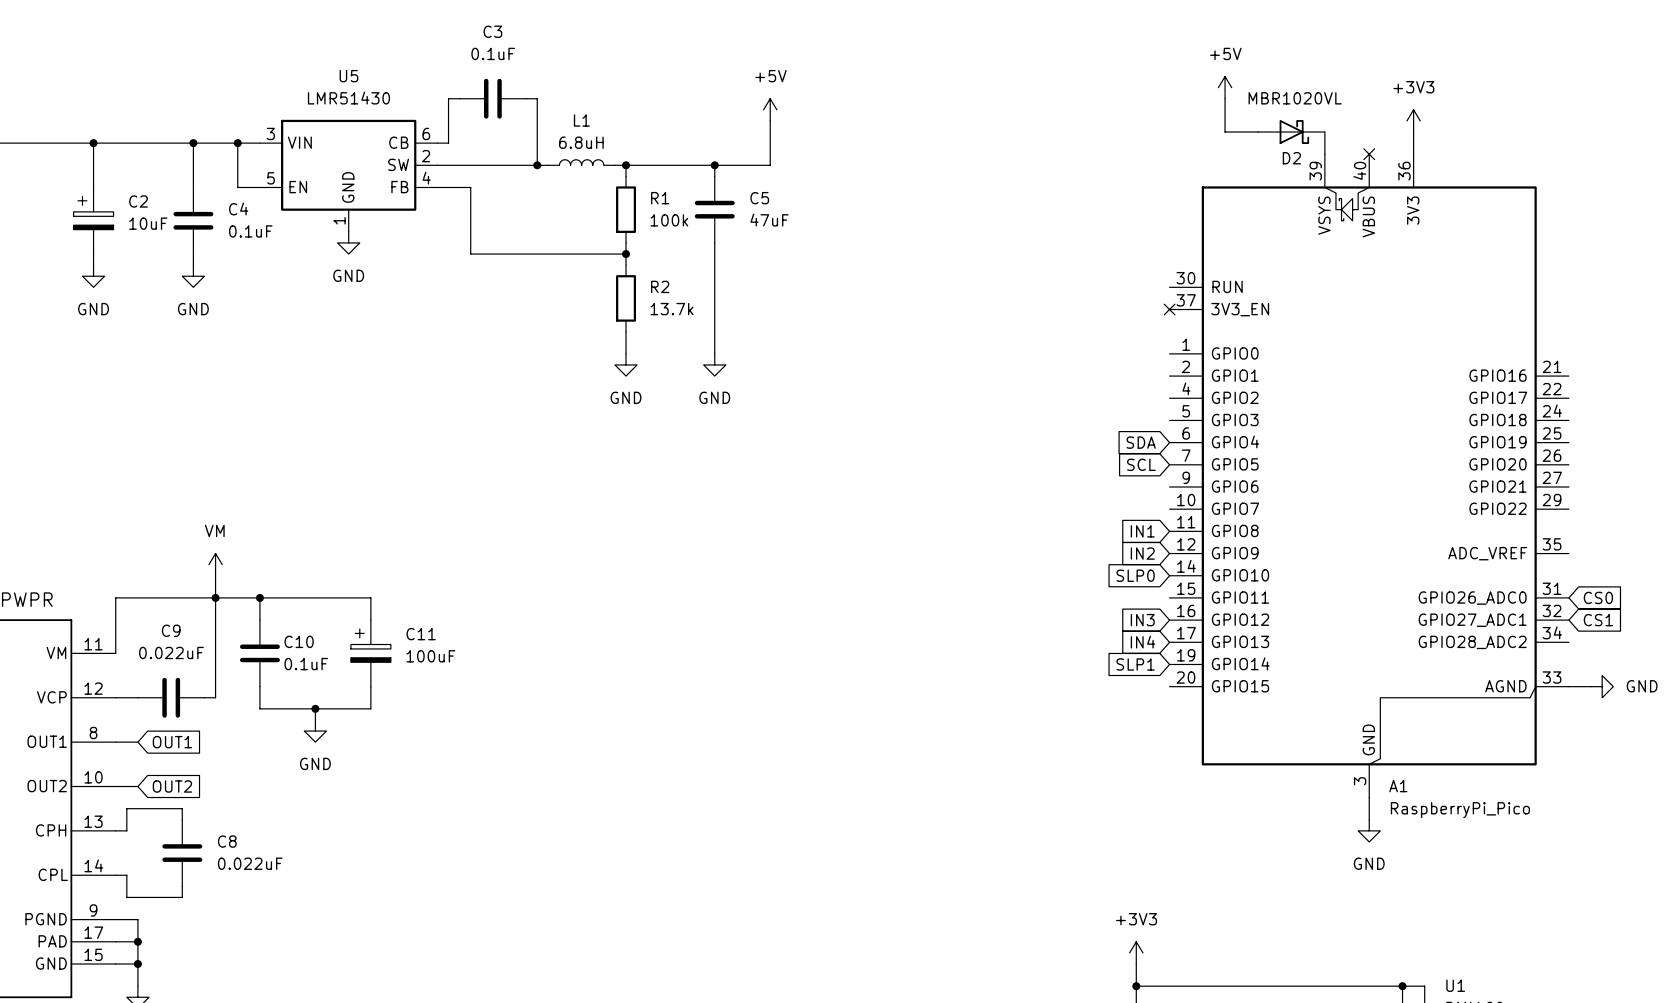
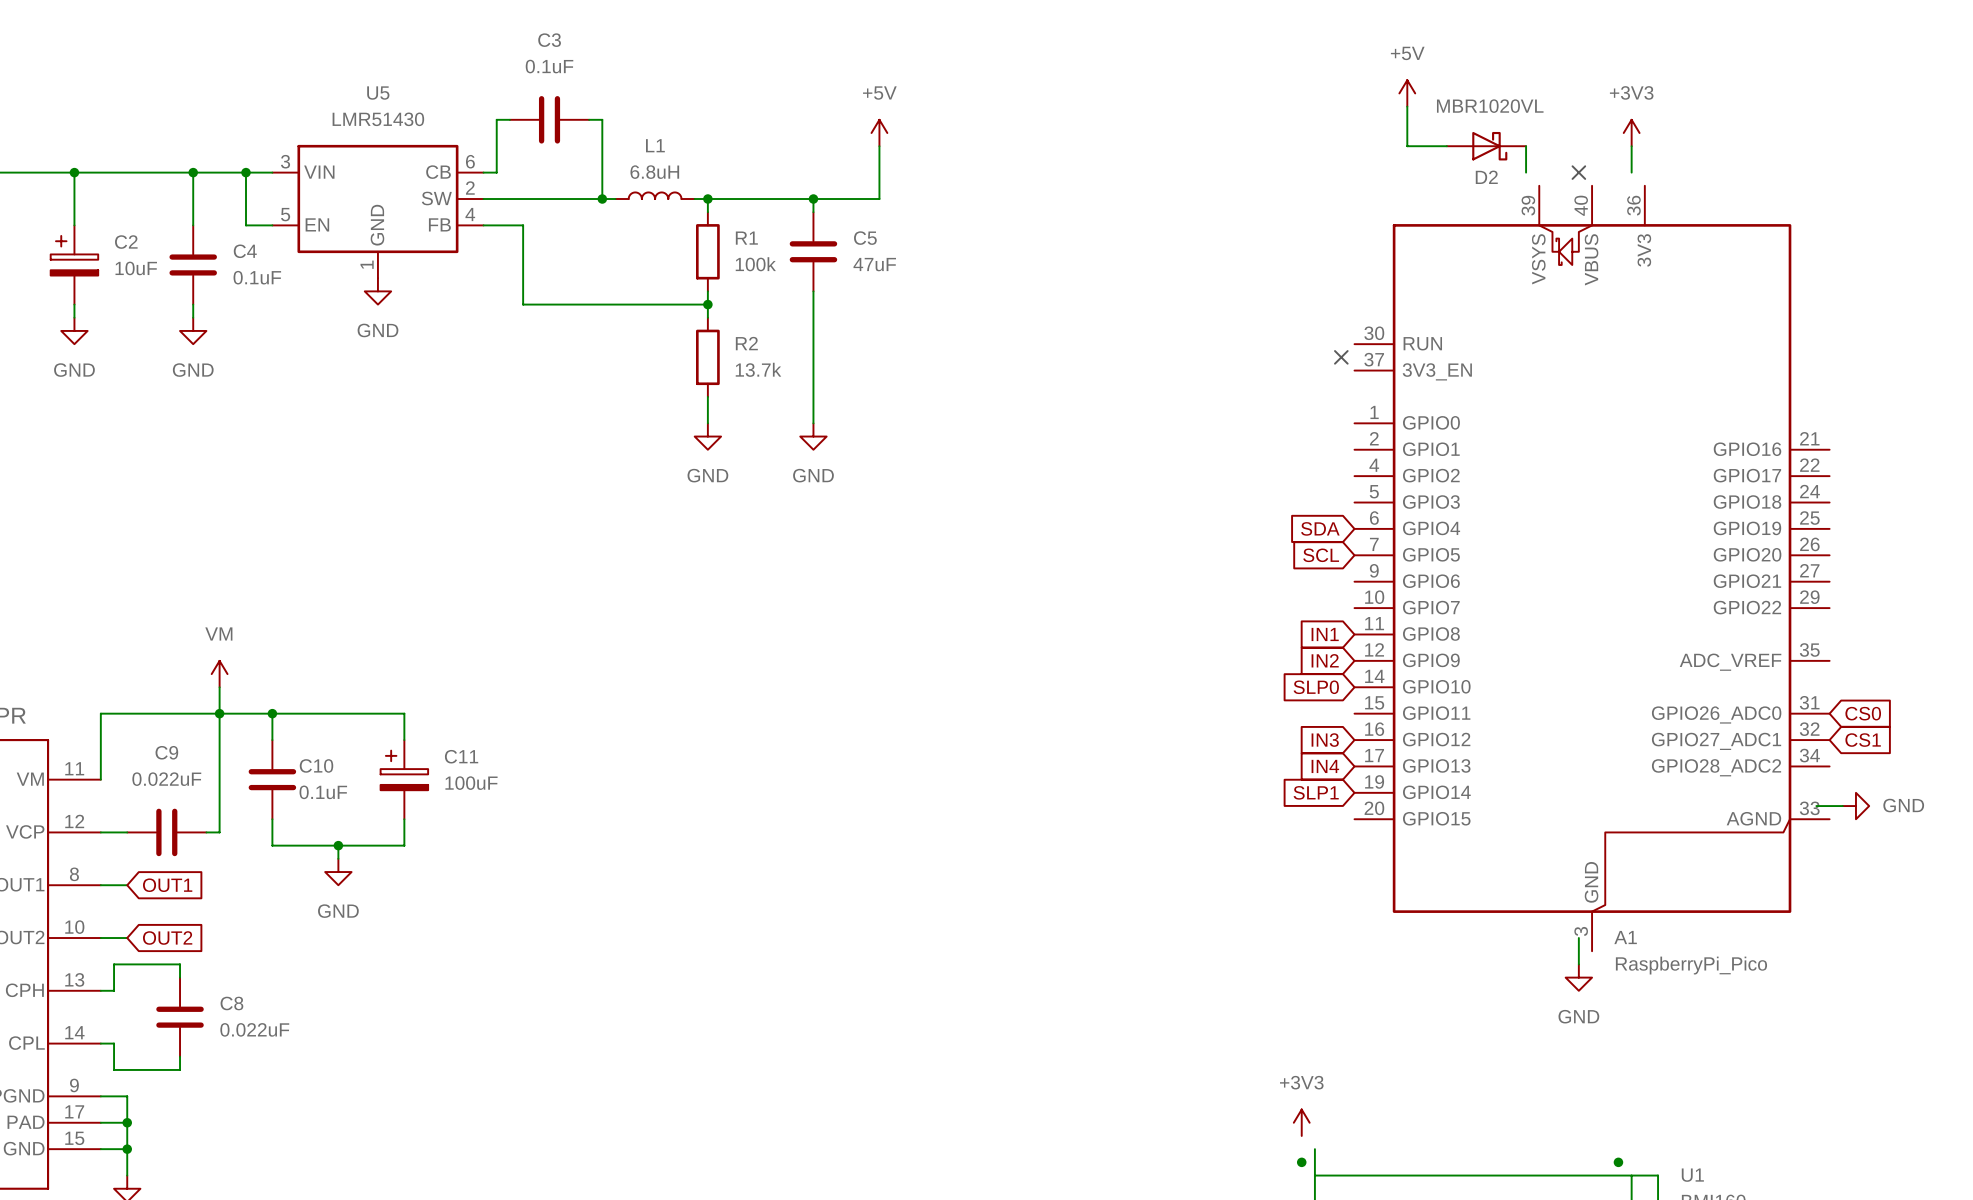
power symbol position: +5V (1225, 87) -> +5V (1407, 93)
wire: (1225, 98) (1225, 132) (1258, 132) -> (1407, 106) (1407, 146) (1446, 146)
power symbol position: +3V3 (1413, 120) -> +3V3 (1631, 133)
D2 position: (1291, 132) -> (1486, 146)
wire: (1324, 132) (1324, 154) -> (1526, 146) (1526, 172)
wire: (1413, 132) (1413, 154) -> (1631, 146) (1631, 172)
no-connect mark position: (1369, 154) -> (1578, 172)
no-connect mark position: (1169, 309) -> (1341, 357)
wire: (1568, 686) (1591, 686) -> (1816, 806) (1842, 806)
power symbol position: GND (1602, 686) -> GND (1855, 806)
wire: (1369, 797) (1369, 819) -> (1578, 938) (1578, 964)
power symbol position: GND (1369, 830) -> GND (1578, 977)
power symbol position: +3V3 (1136, 952) -> +3V3 (1301, 1122)
junction position: (1136, 986) -> (1301, 1162)
junction position: (1402, 986) -> (1618, 1162)

